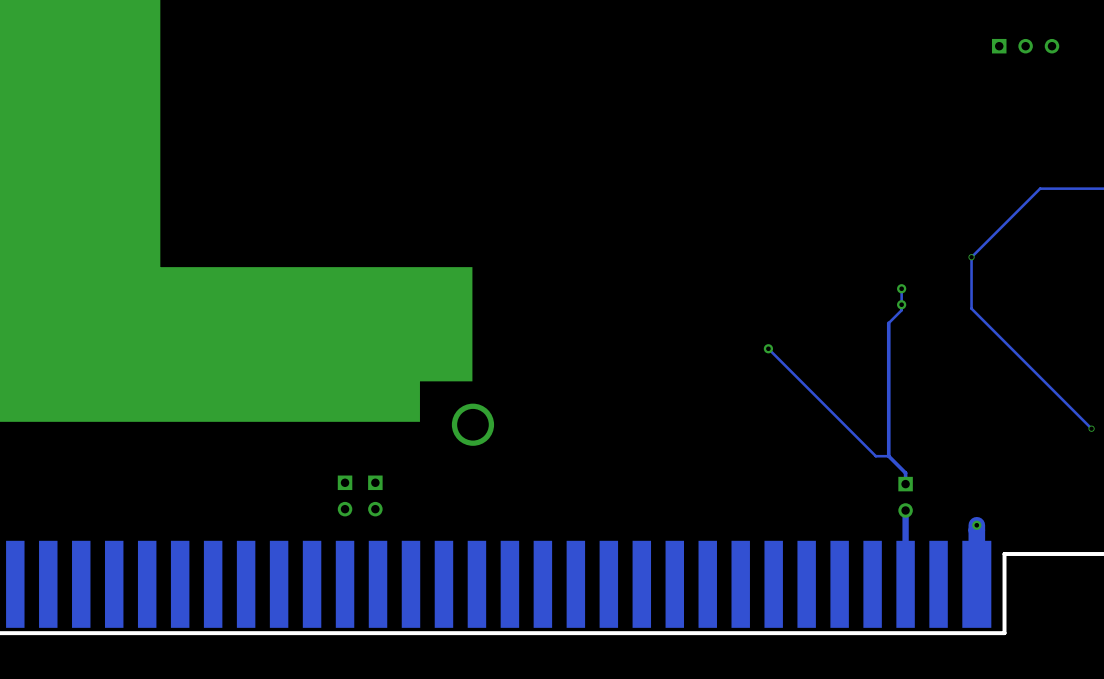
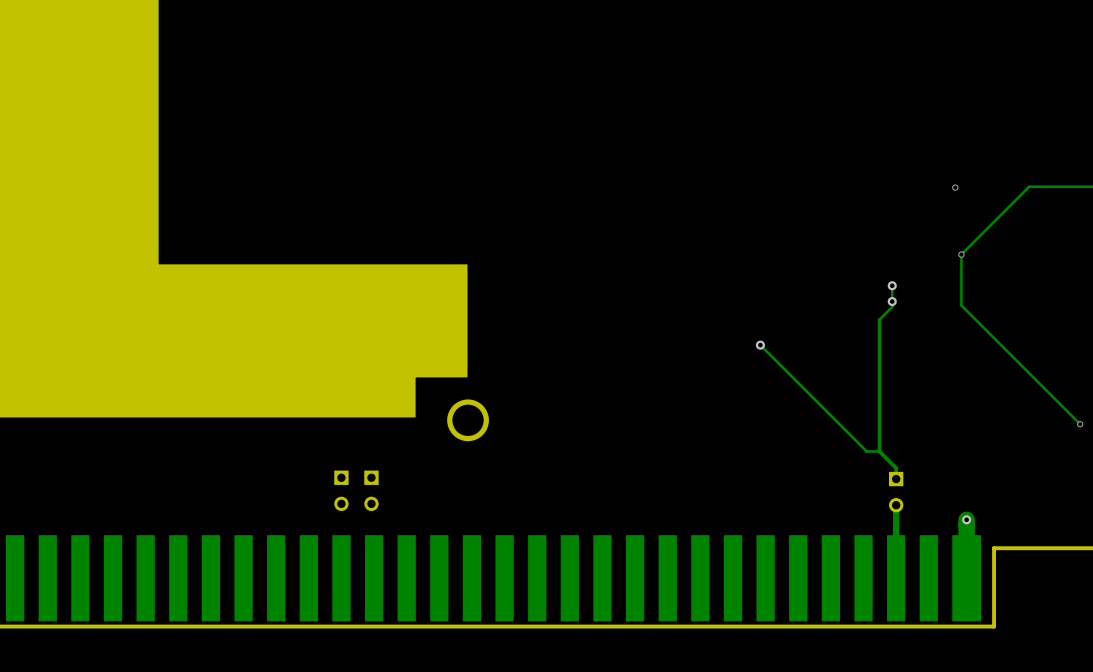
part: (1025, 46) -> none
via: none -> (955, 187)

